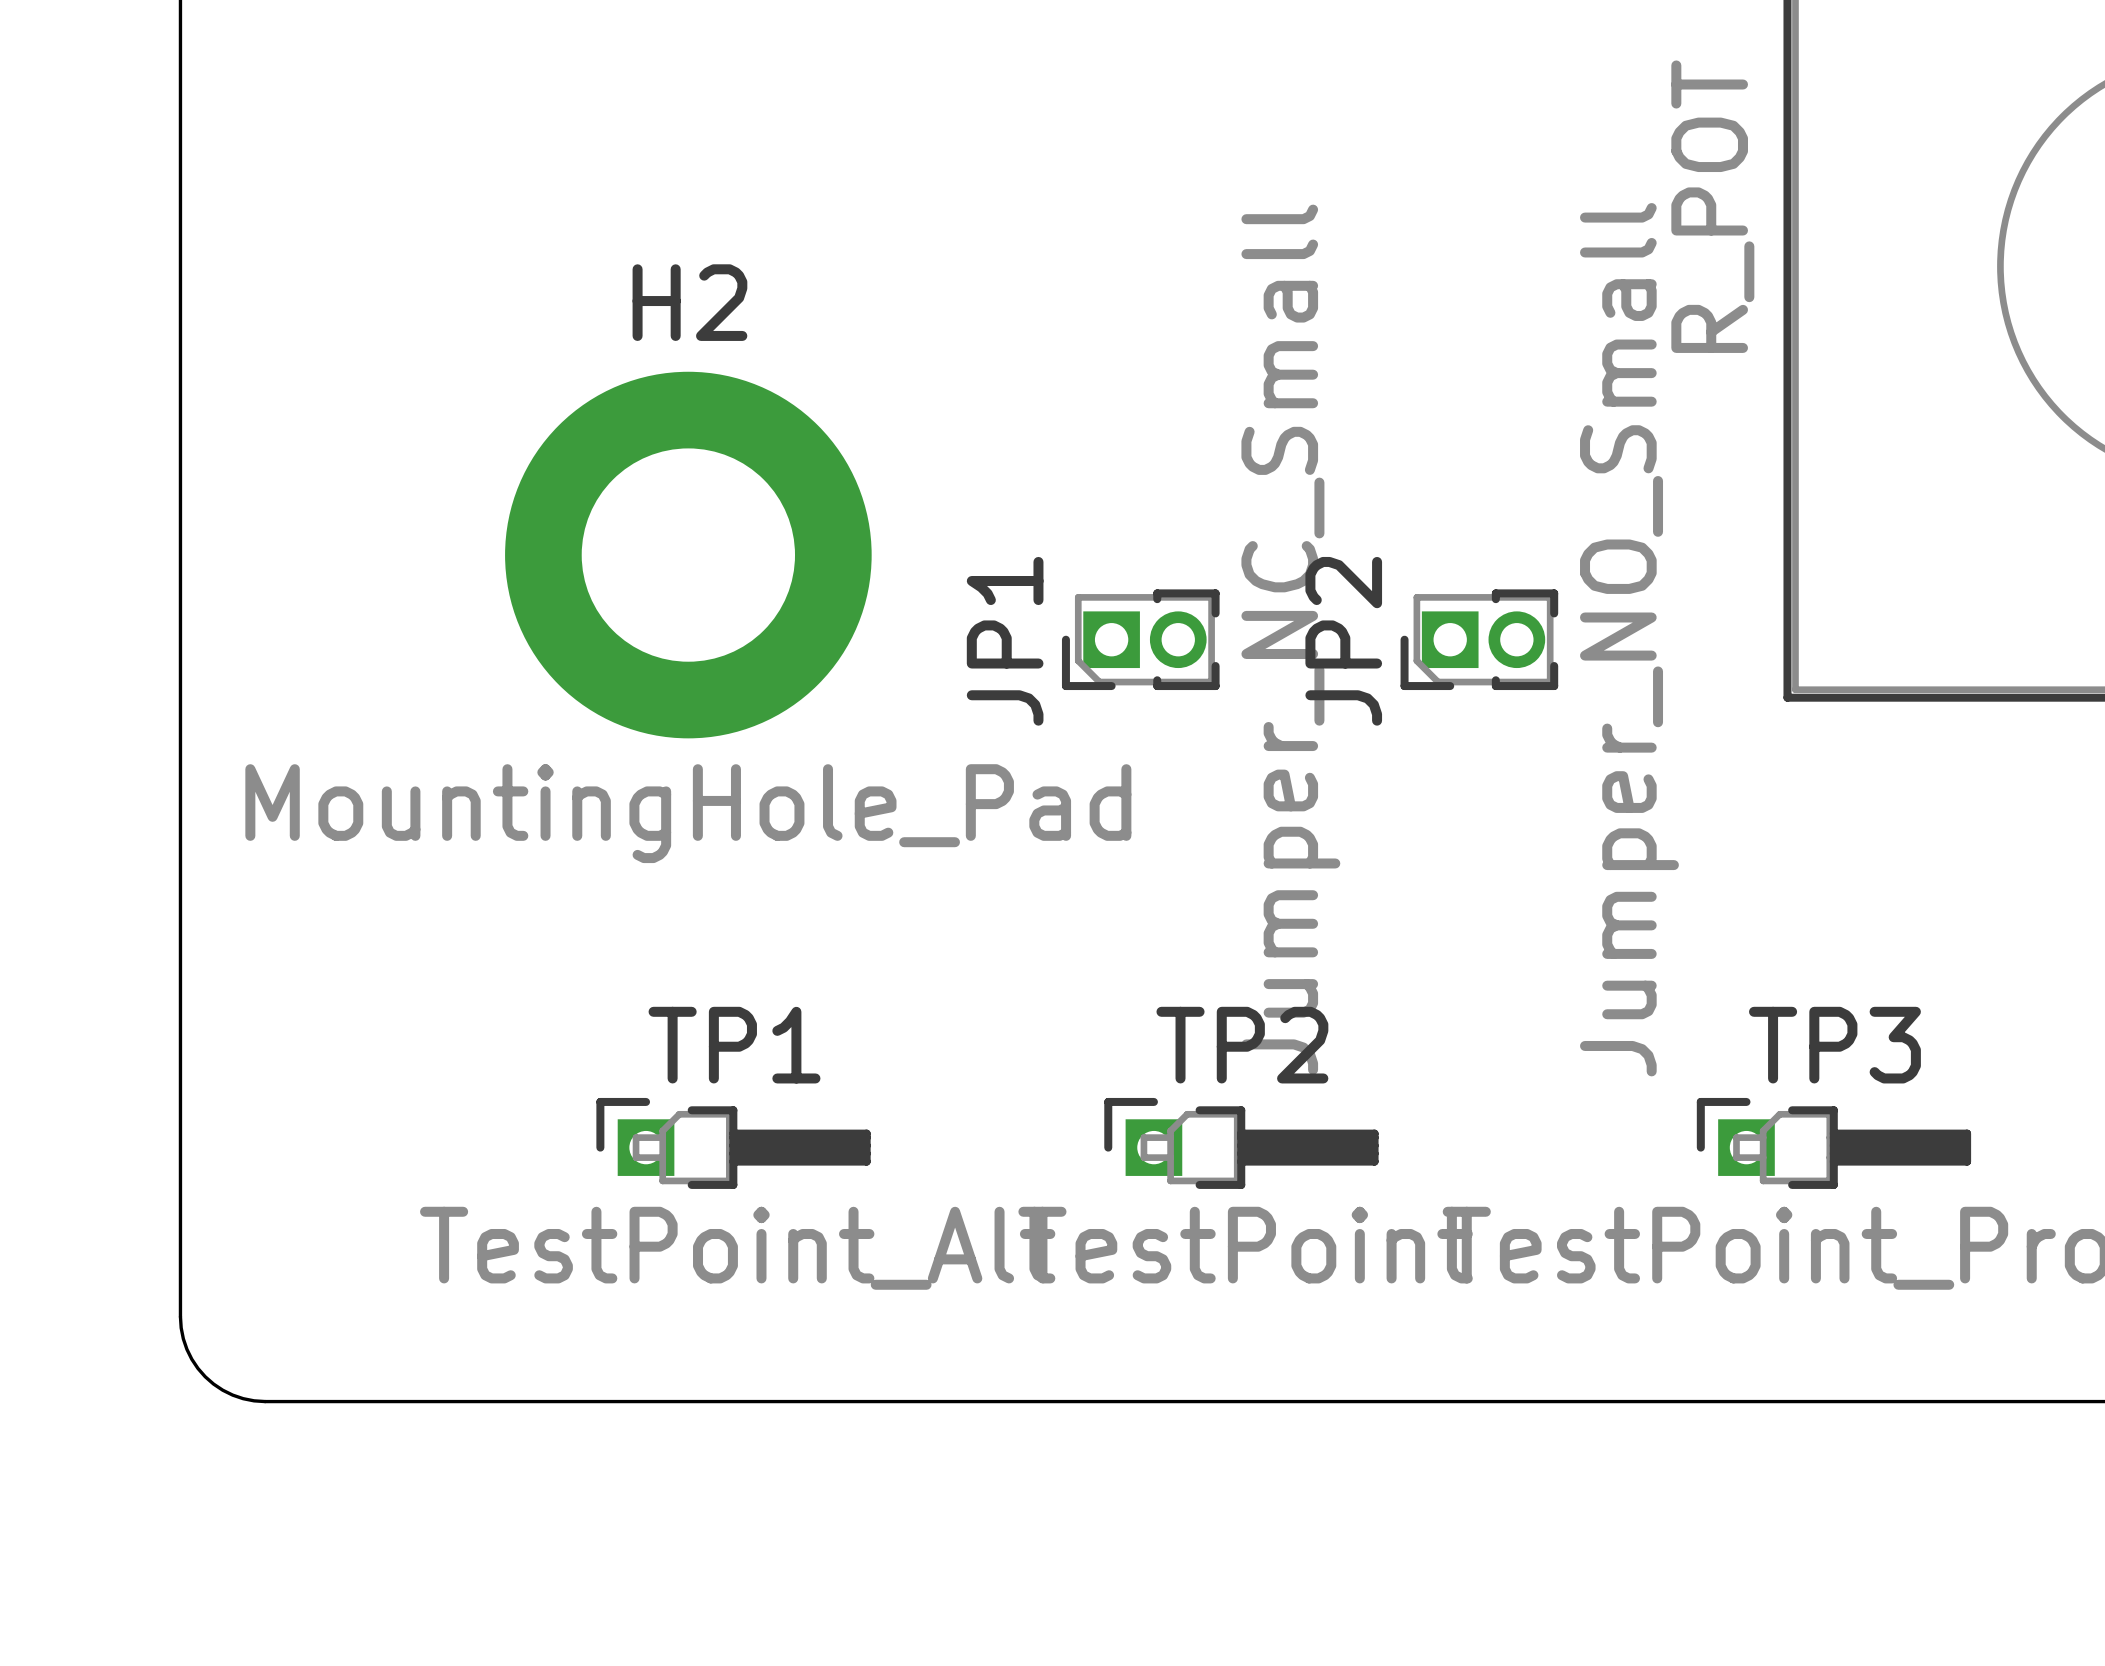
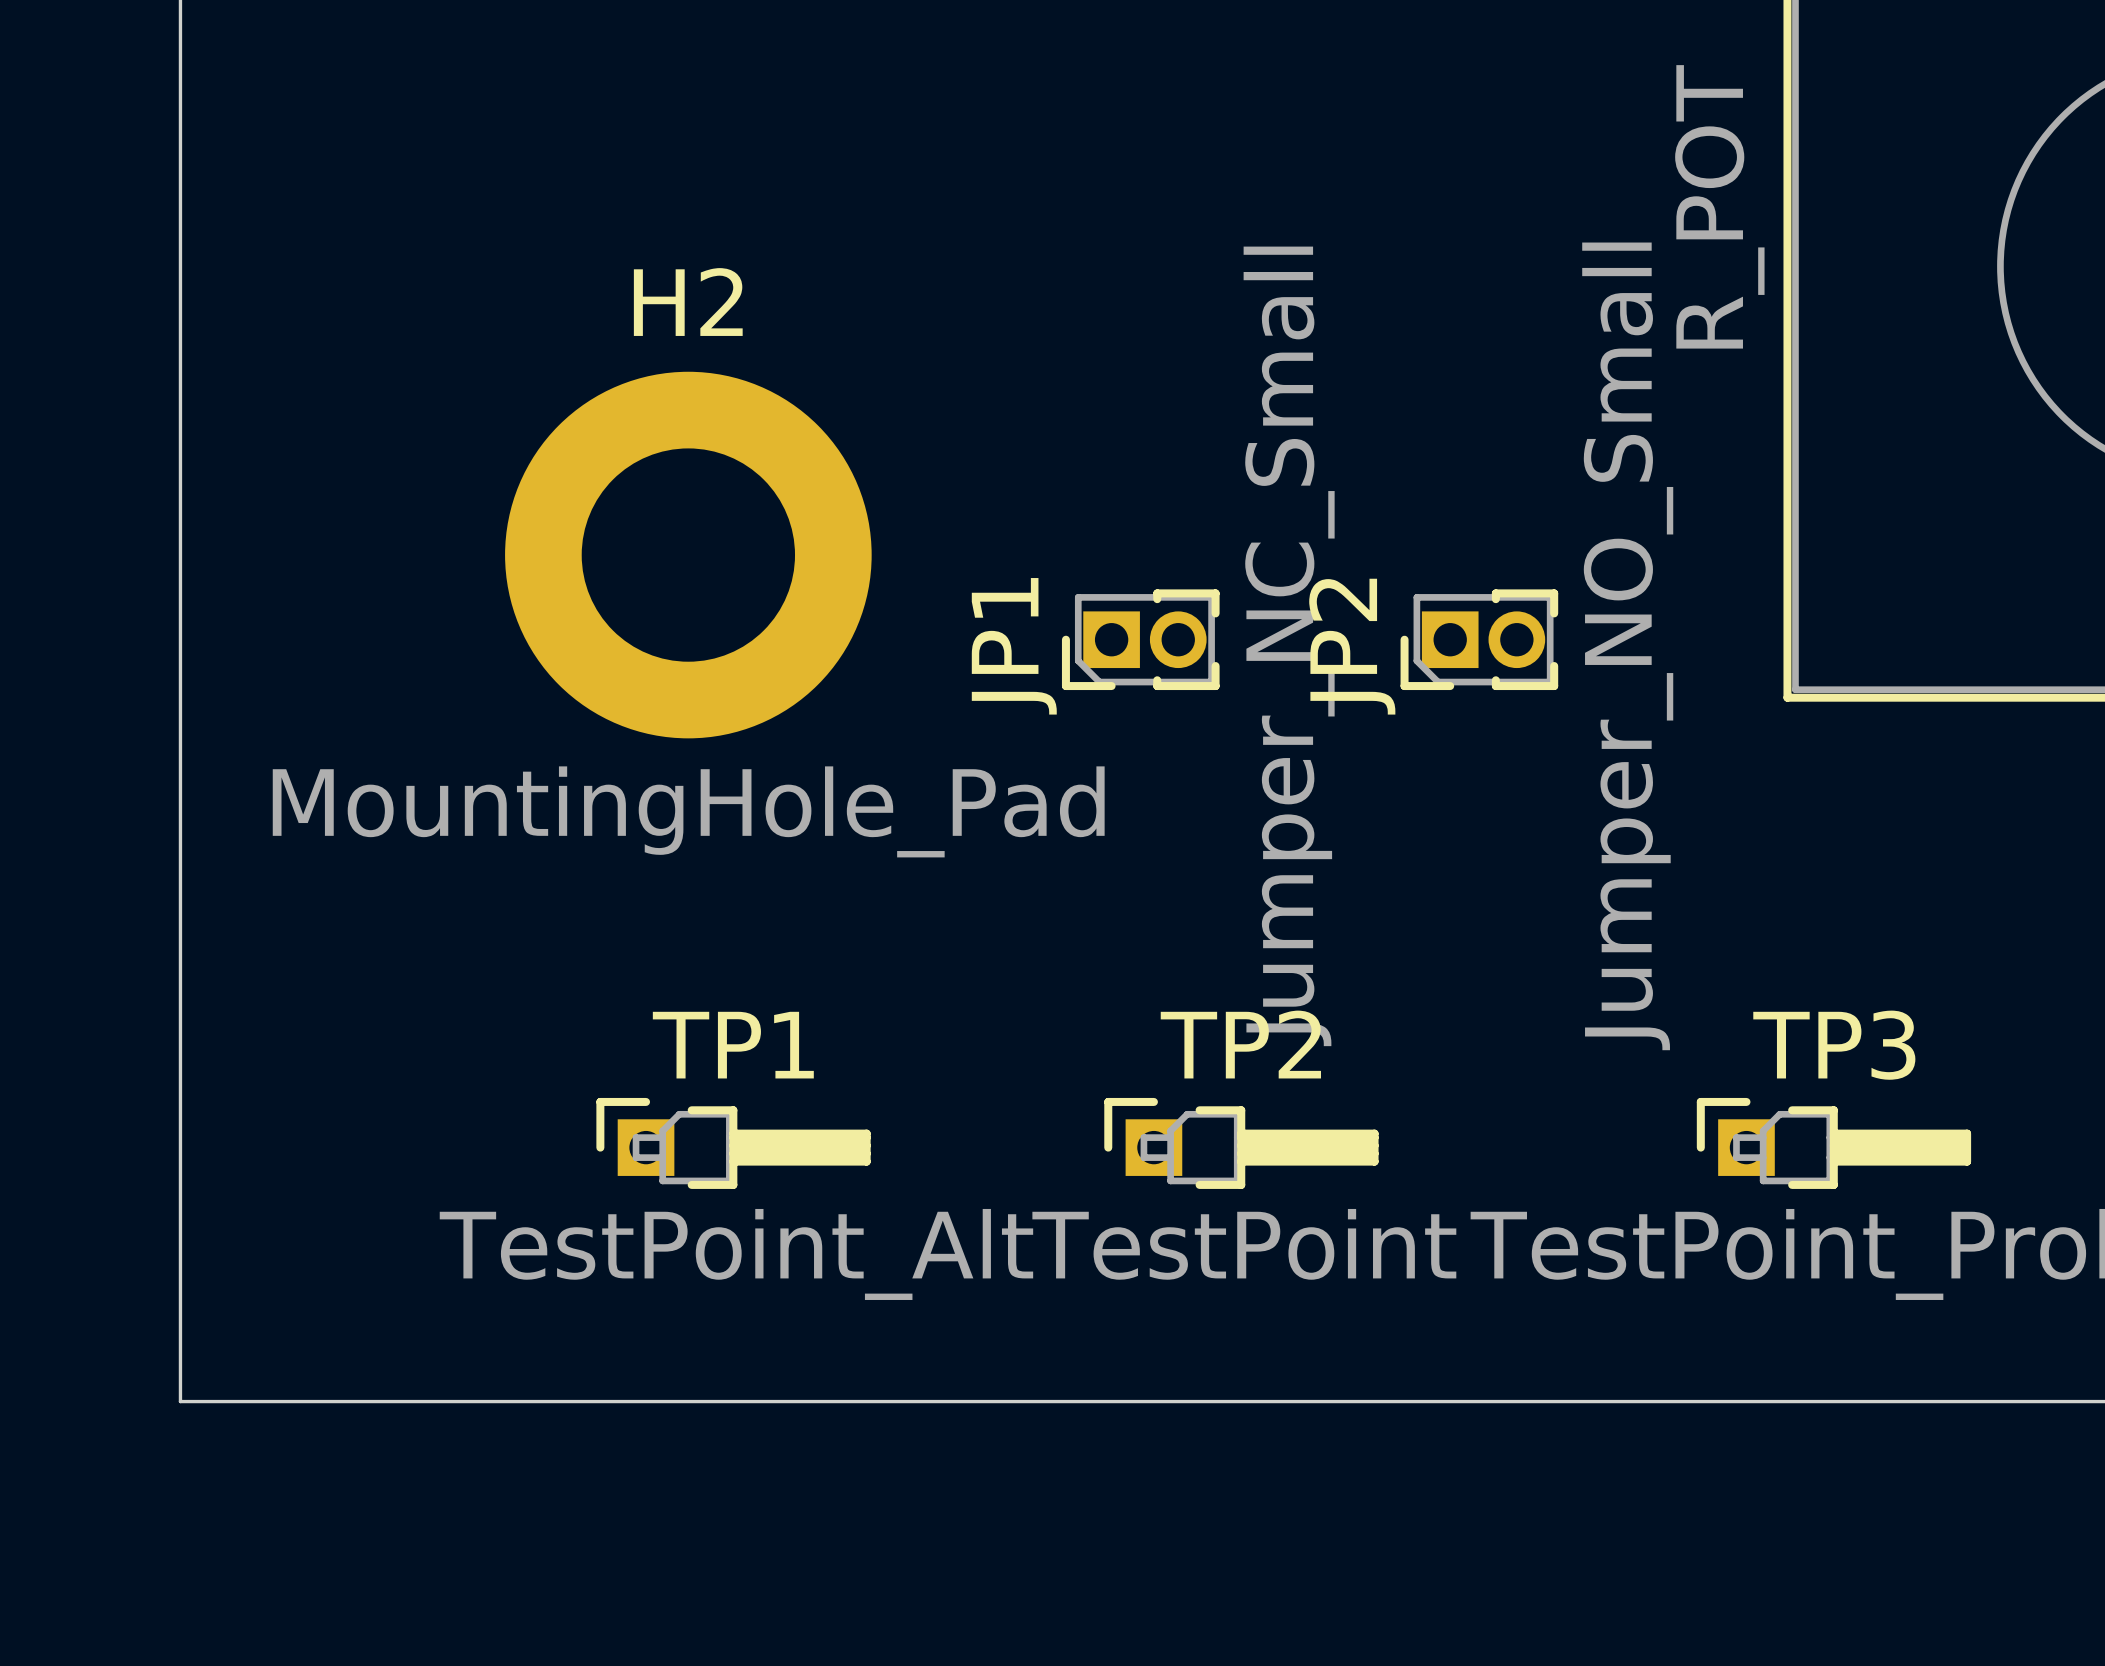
board edge: (180, 1316) (186, 1349) (205, 1376) (232, 1395) (265, 1401) -> (180, 1316) (180, 1401) (265, 1401)

